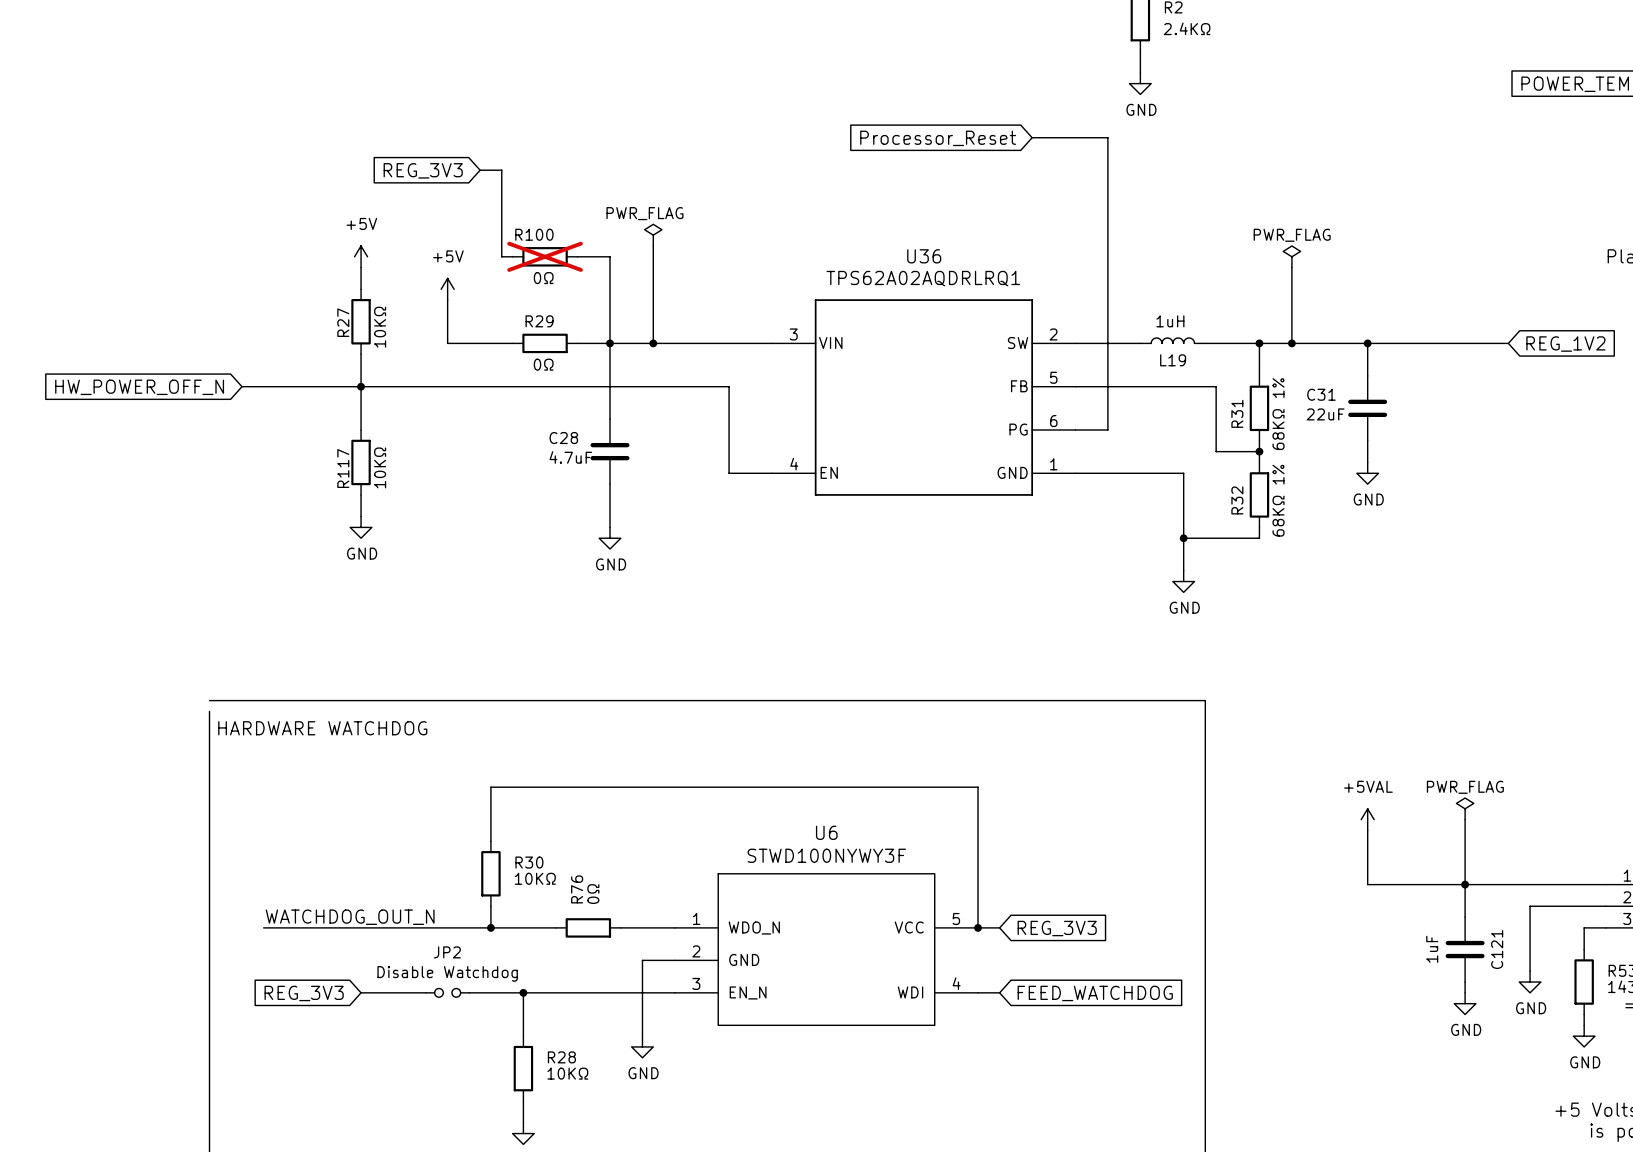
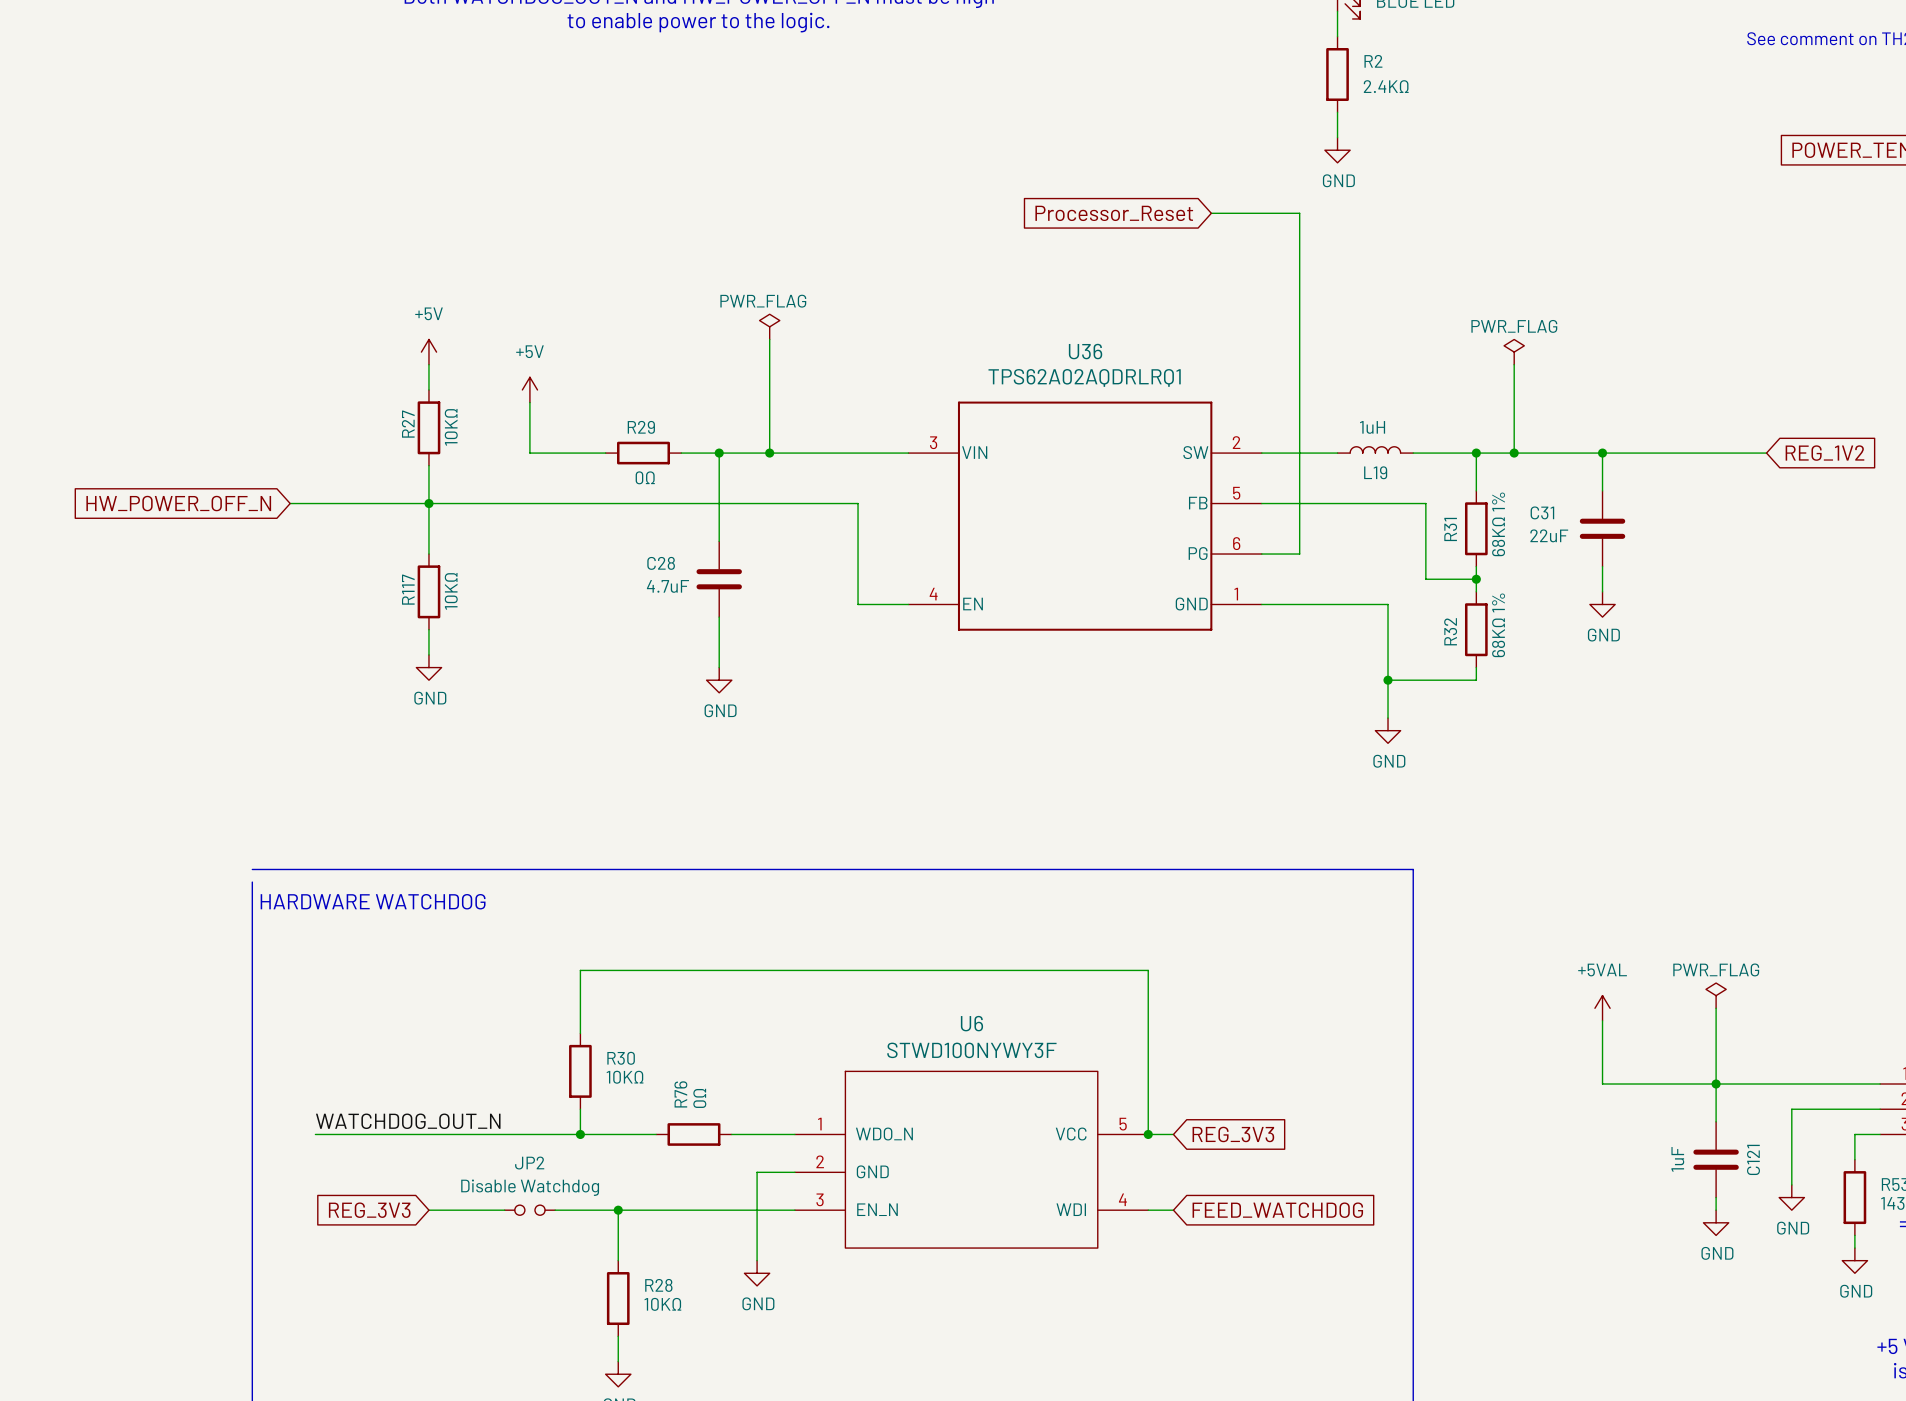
global label: REG_3V3 (423, 170) -> none
wire: (480, 170) (501, 170) (501, 256) (512, 256) -> none
R100: 0Ω (545, 256) -> none
wire: (577, 256) (609, 256) (609, 343) -> none

